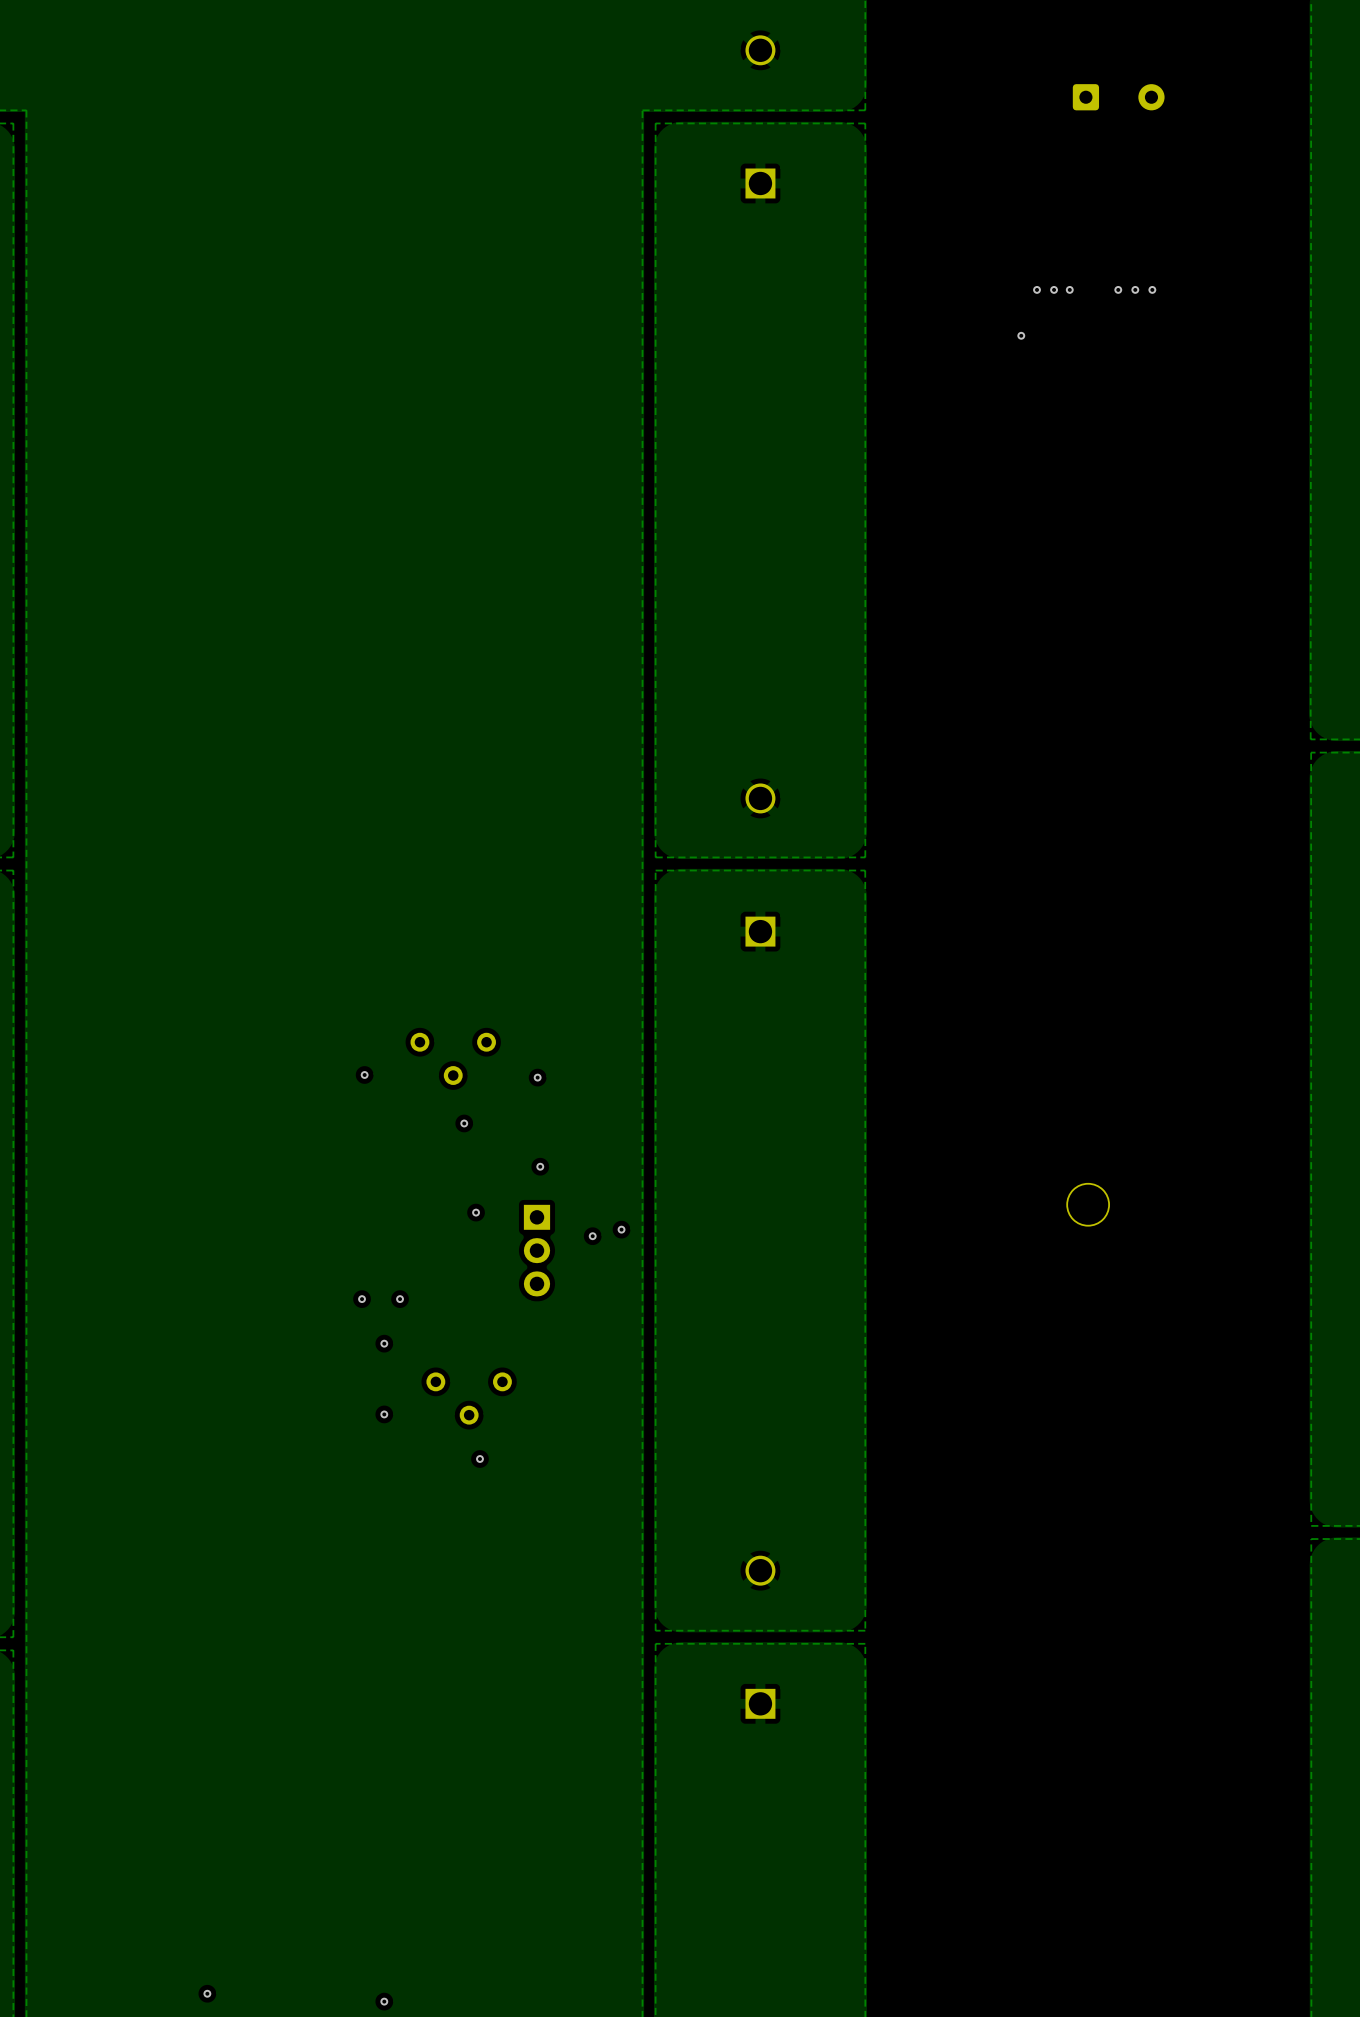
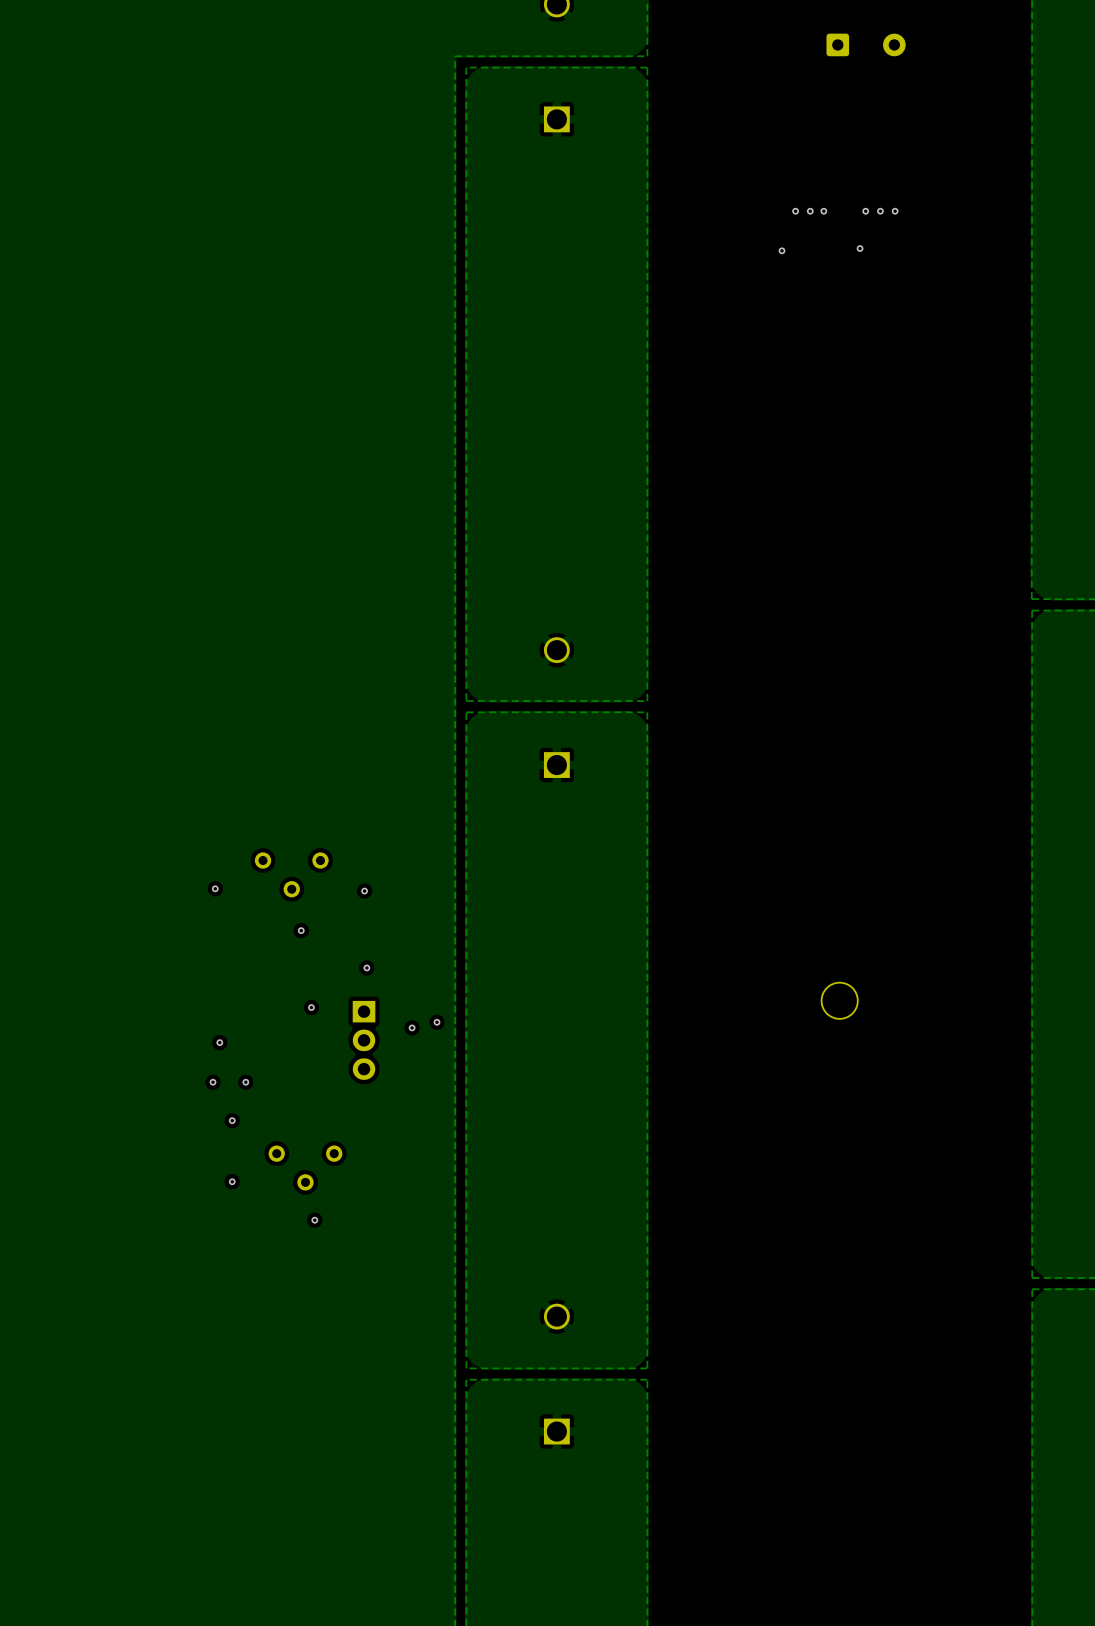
via: none -> (860, 248)
via: none -> (219, 1042)

